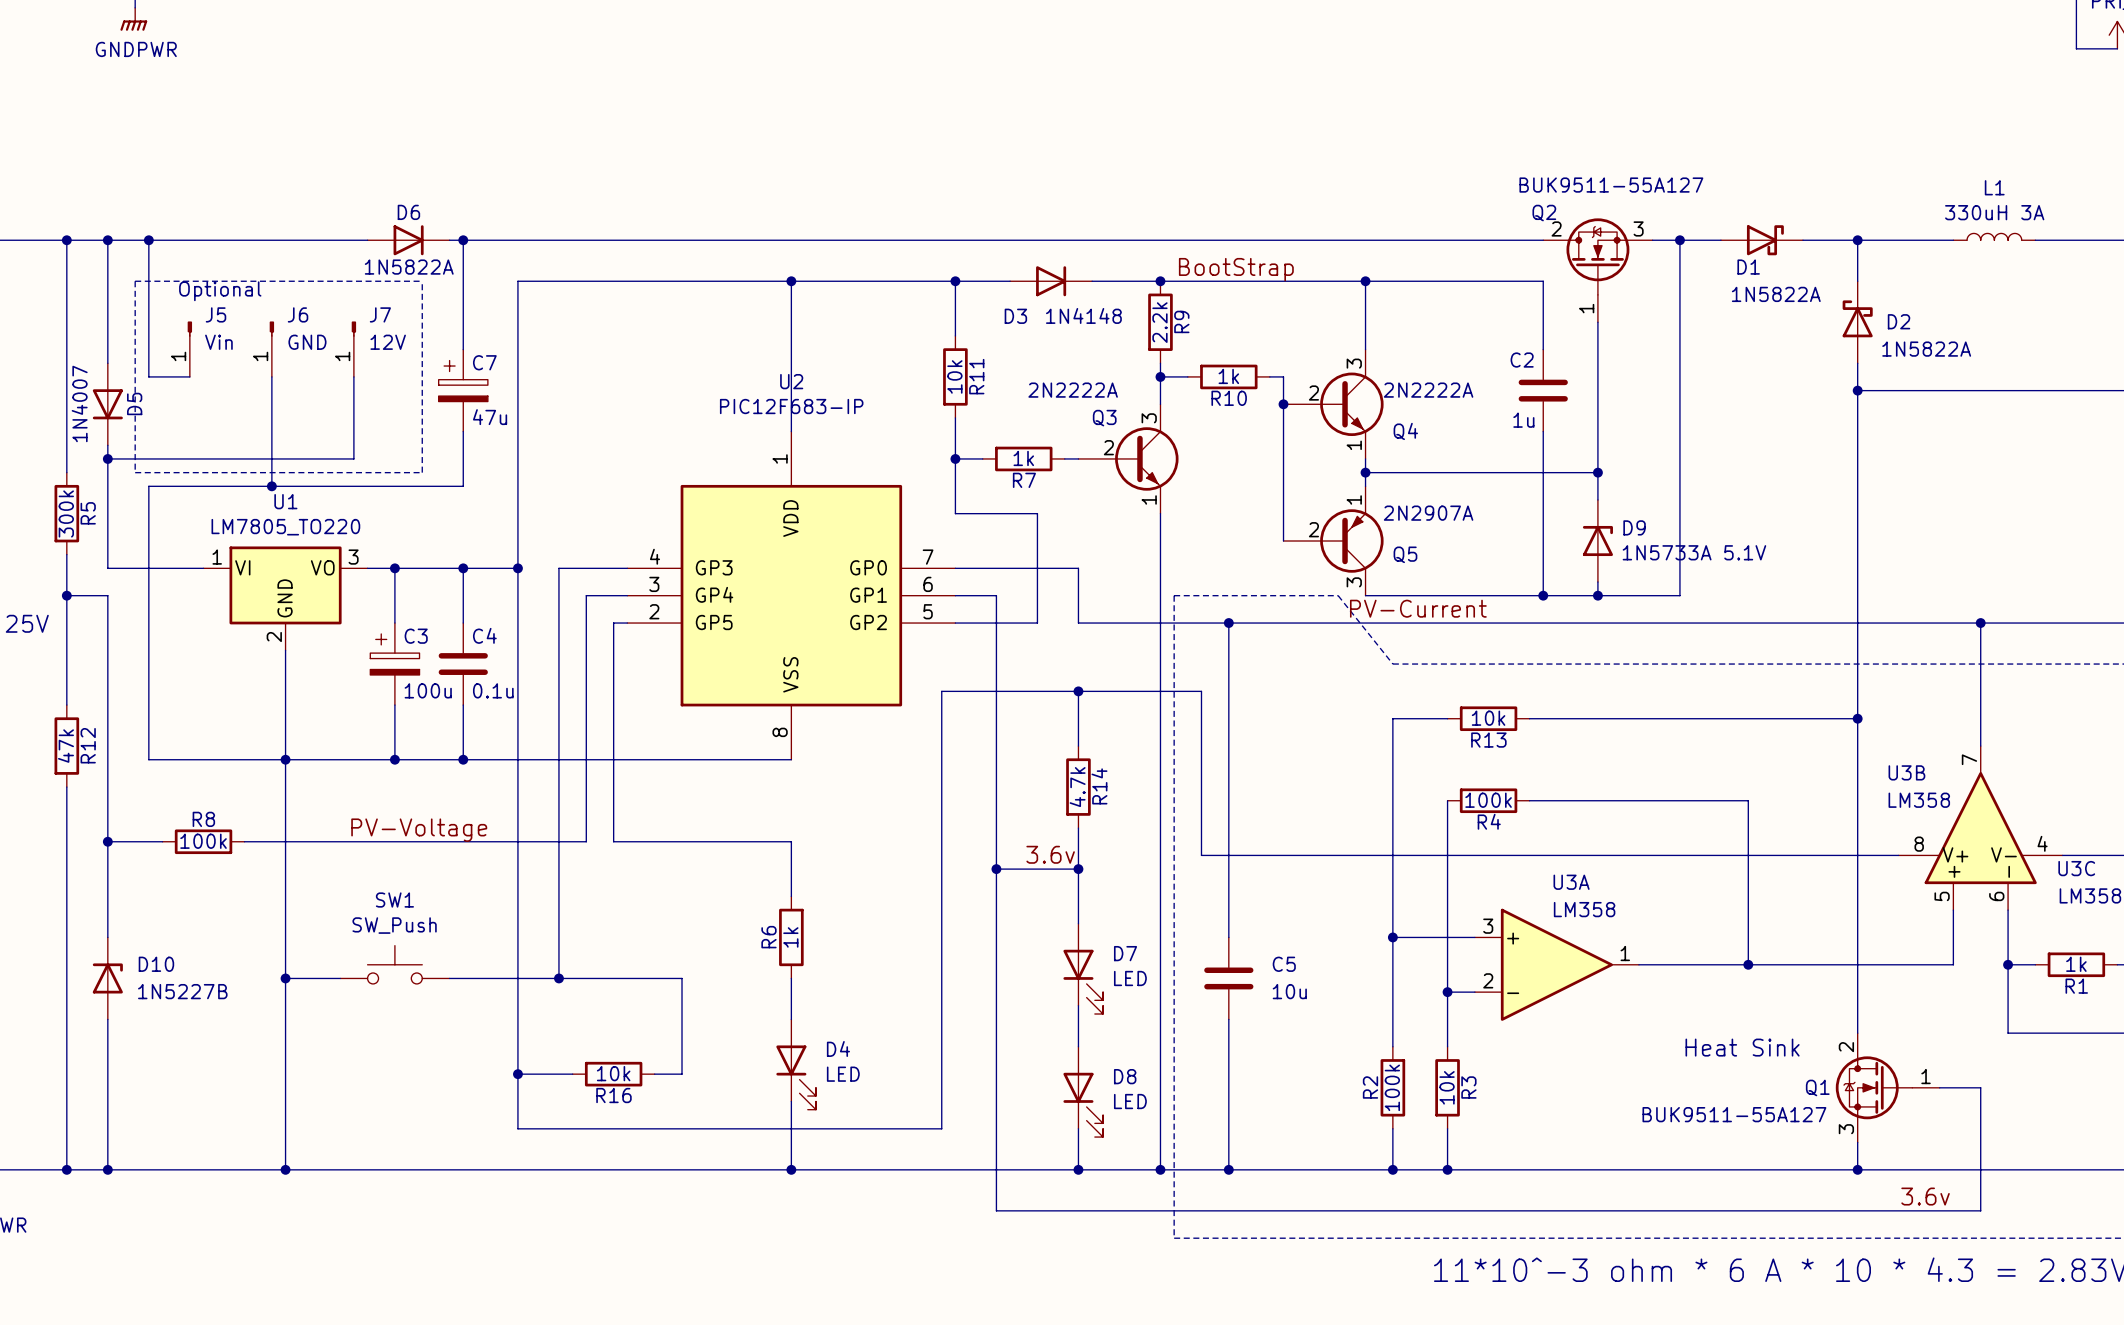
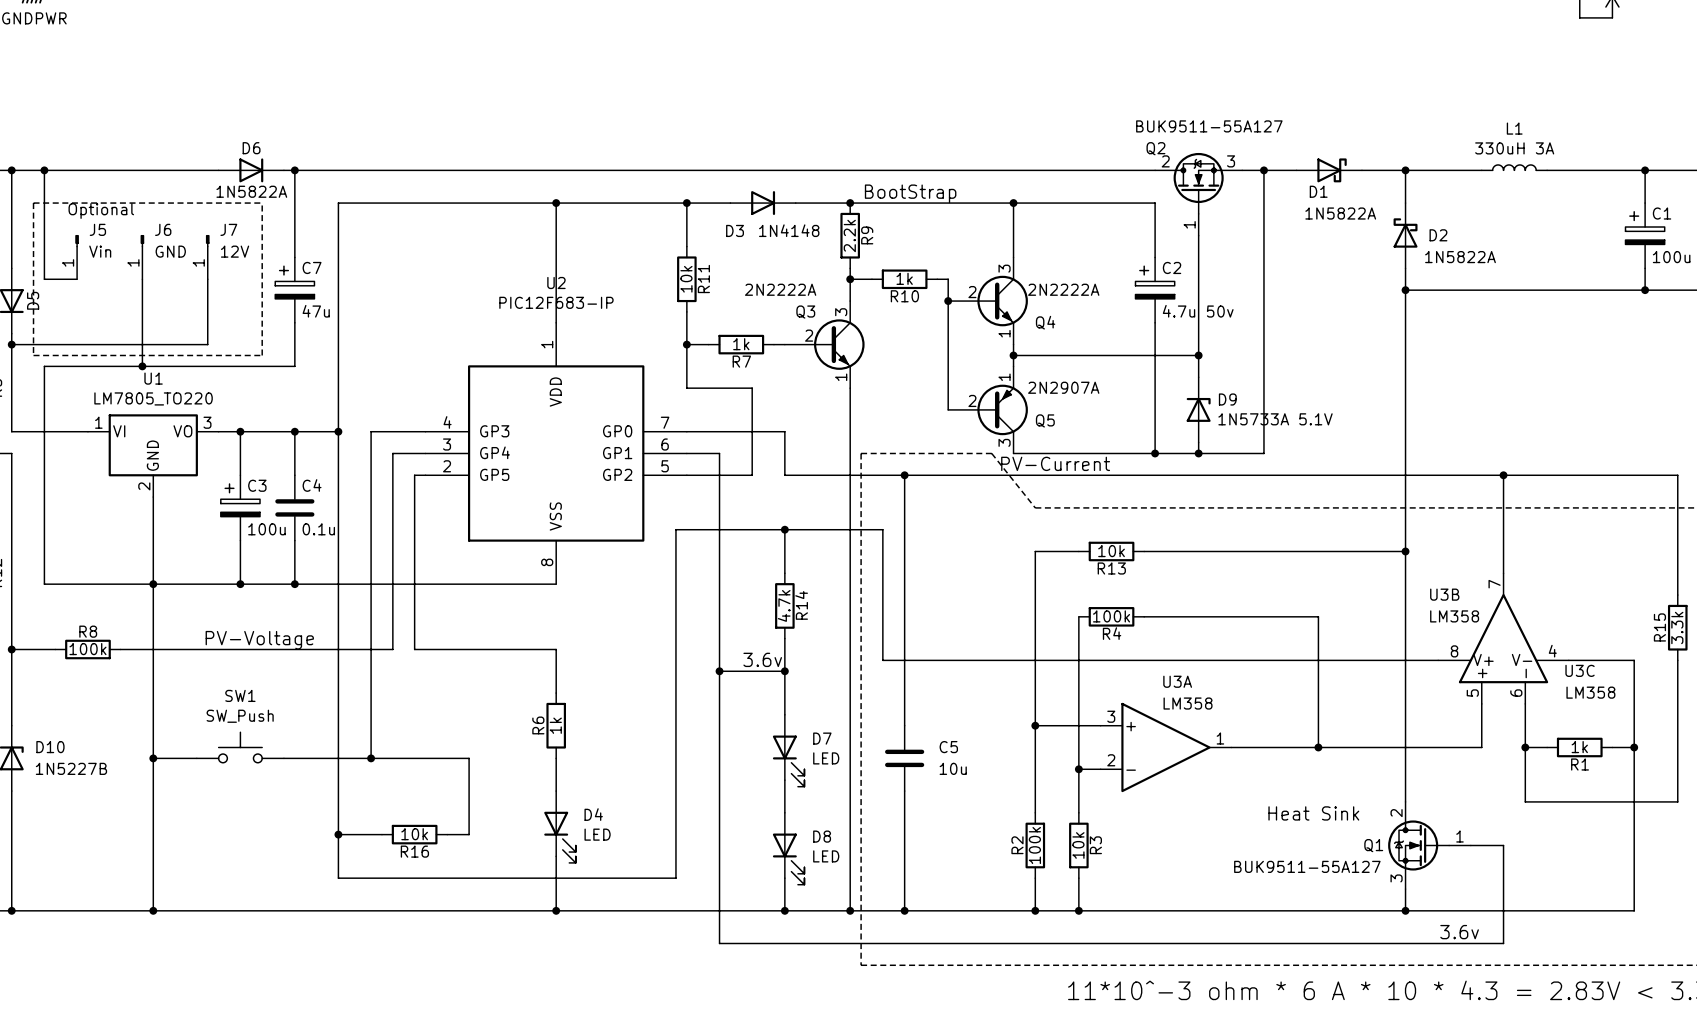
C2 symbol: [1518, 349, 1568, 432] -> [1135, 257, 1175, 323]
C2 name position: C2 (1522, 360) -> C2 (1172, 267)
C2 value: 1u (1523, 420) -> 4.7u 50v (1198, 311)

